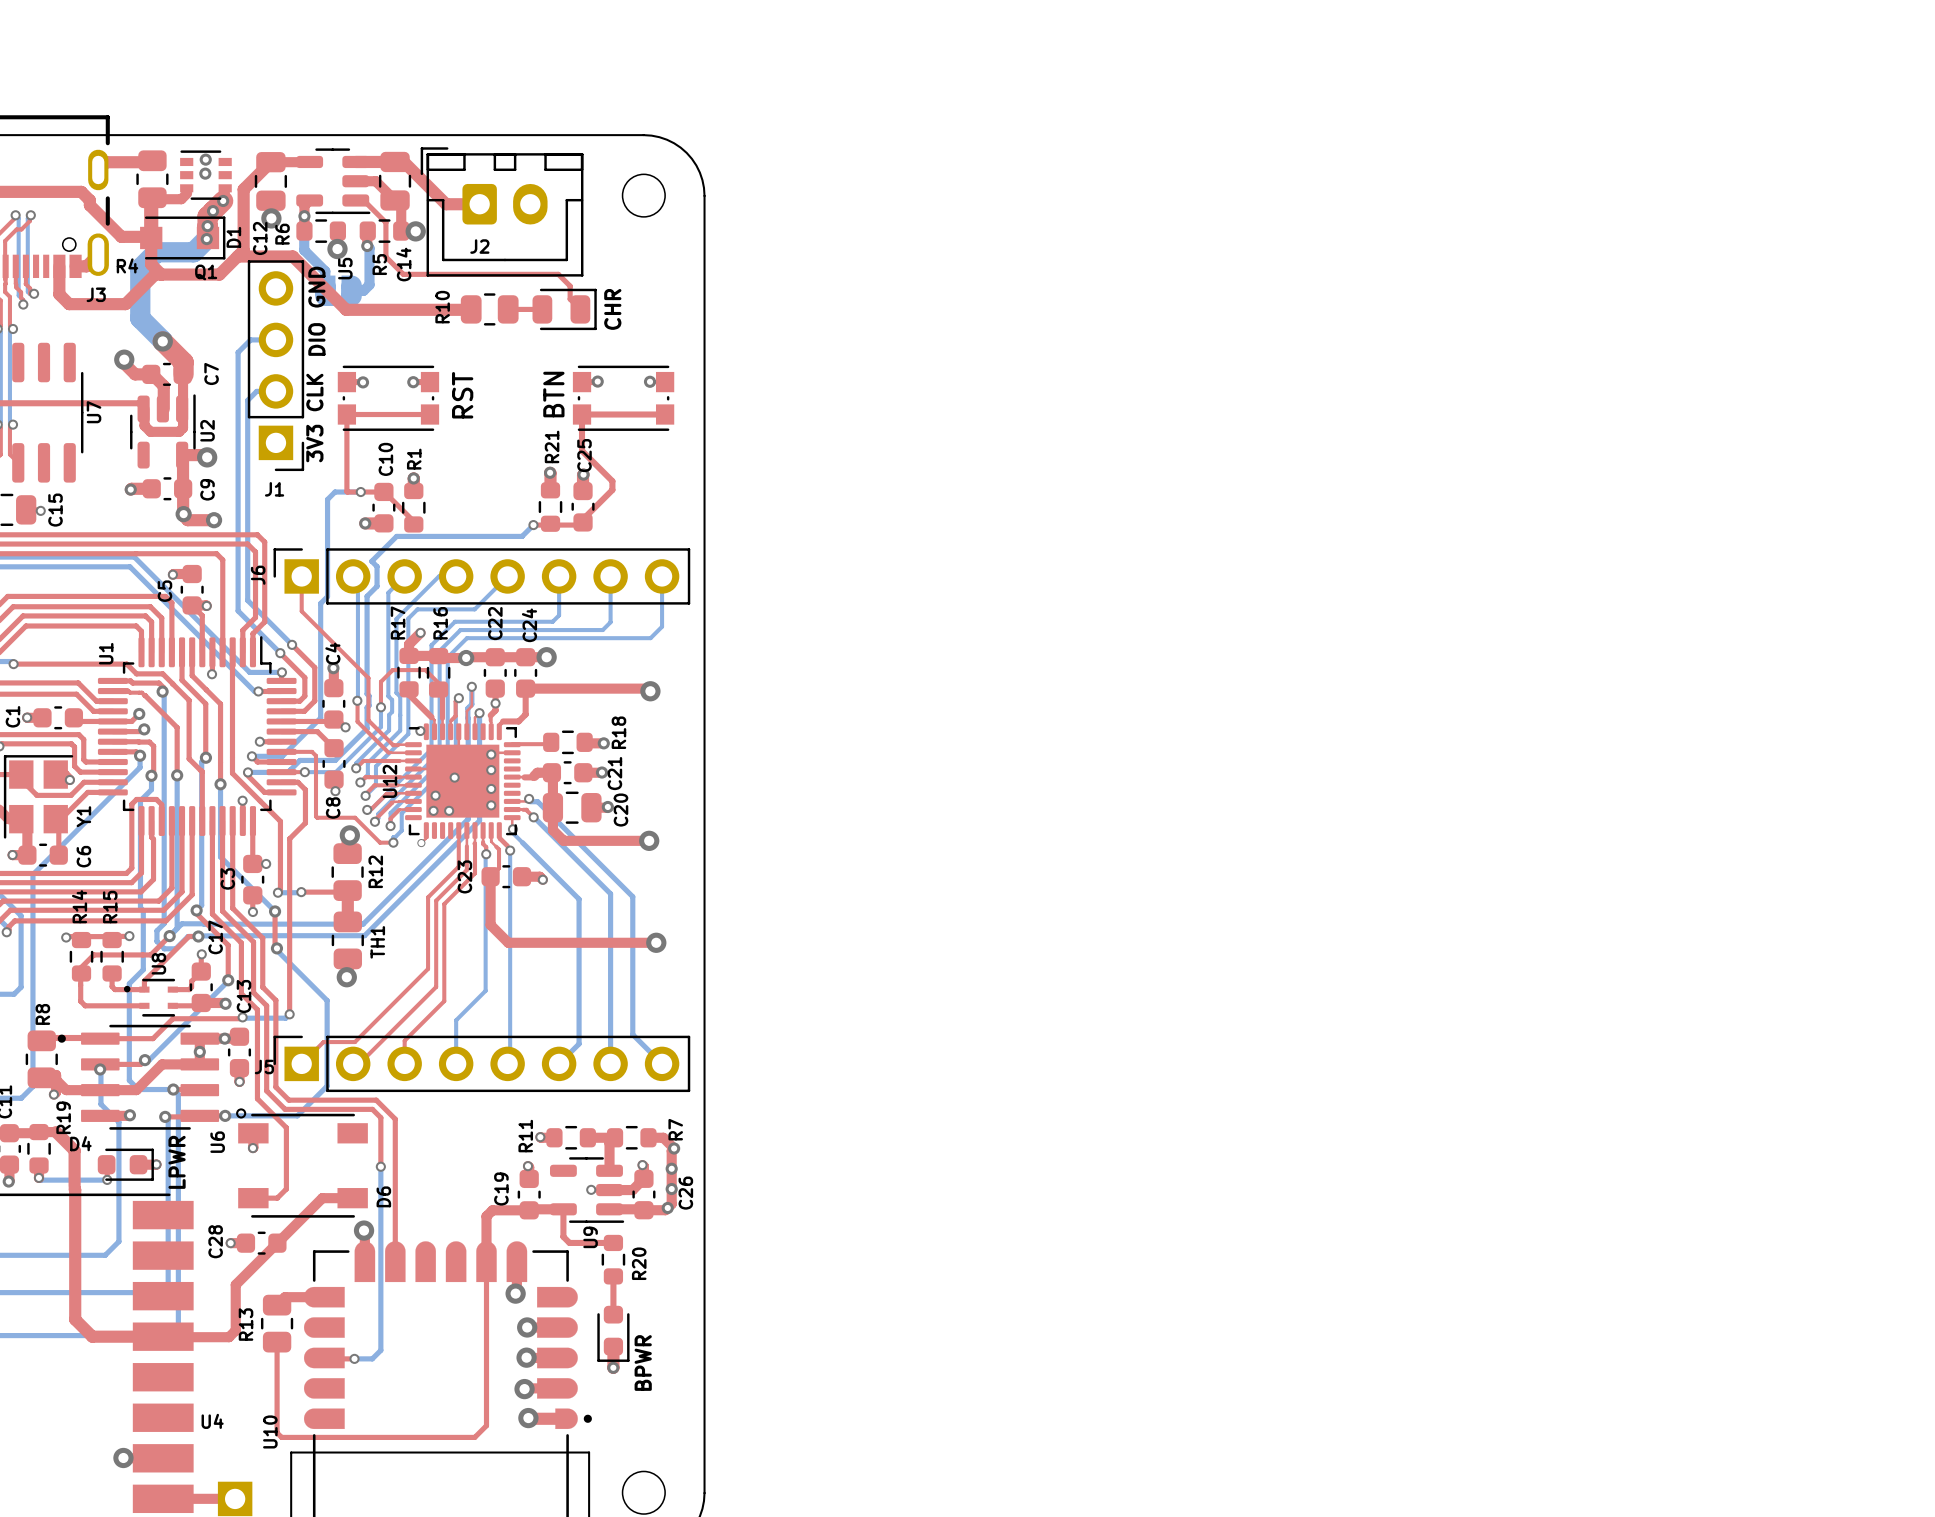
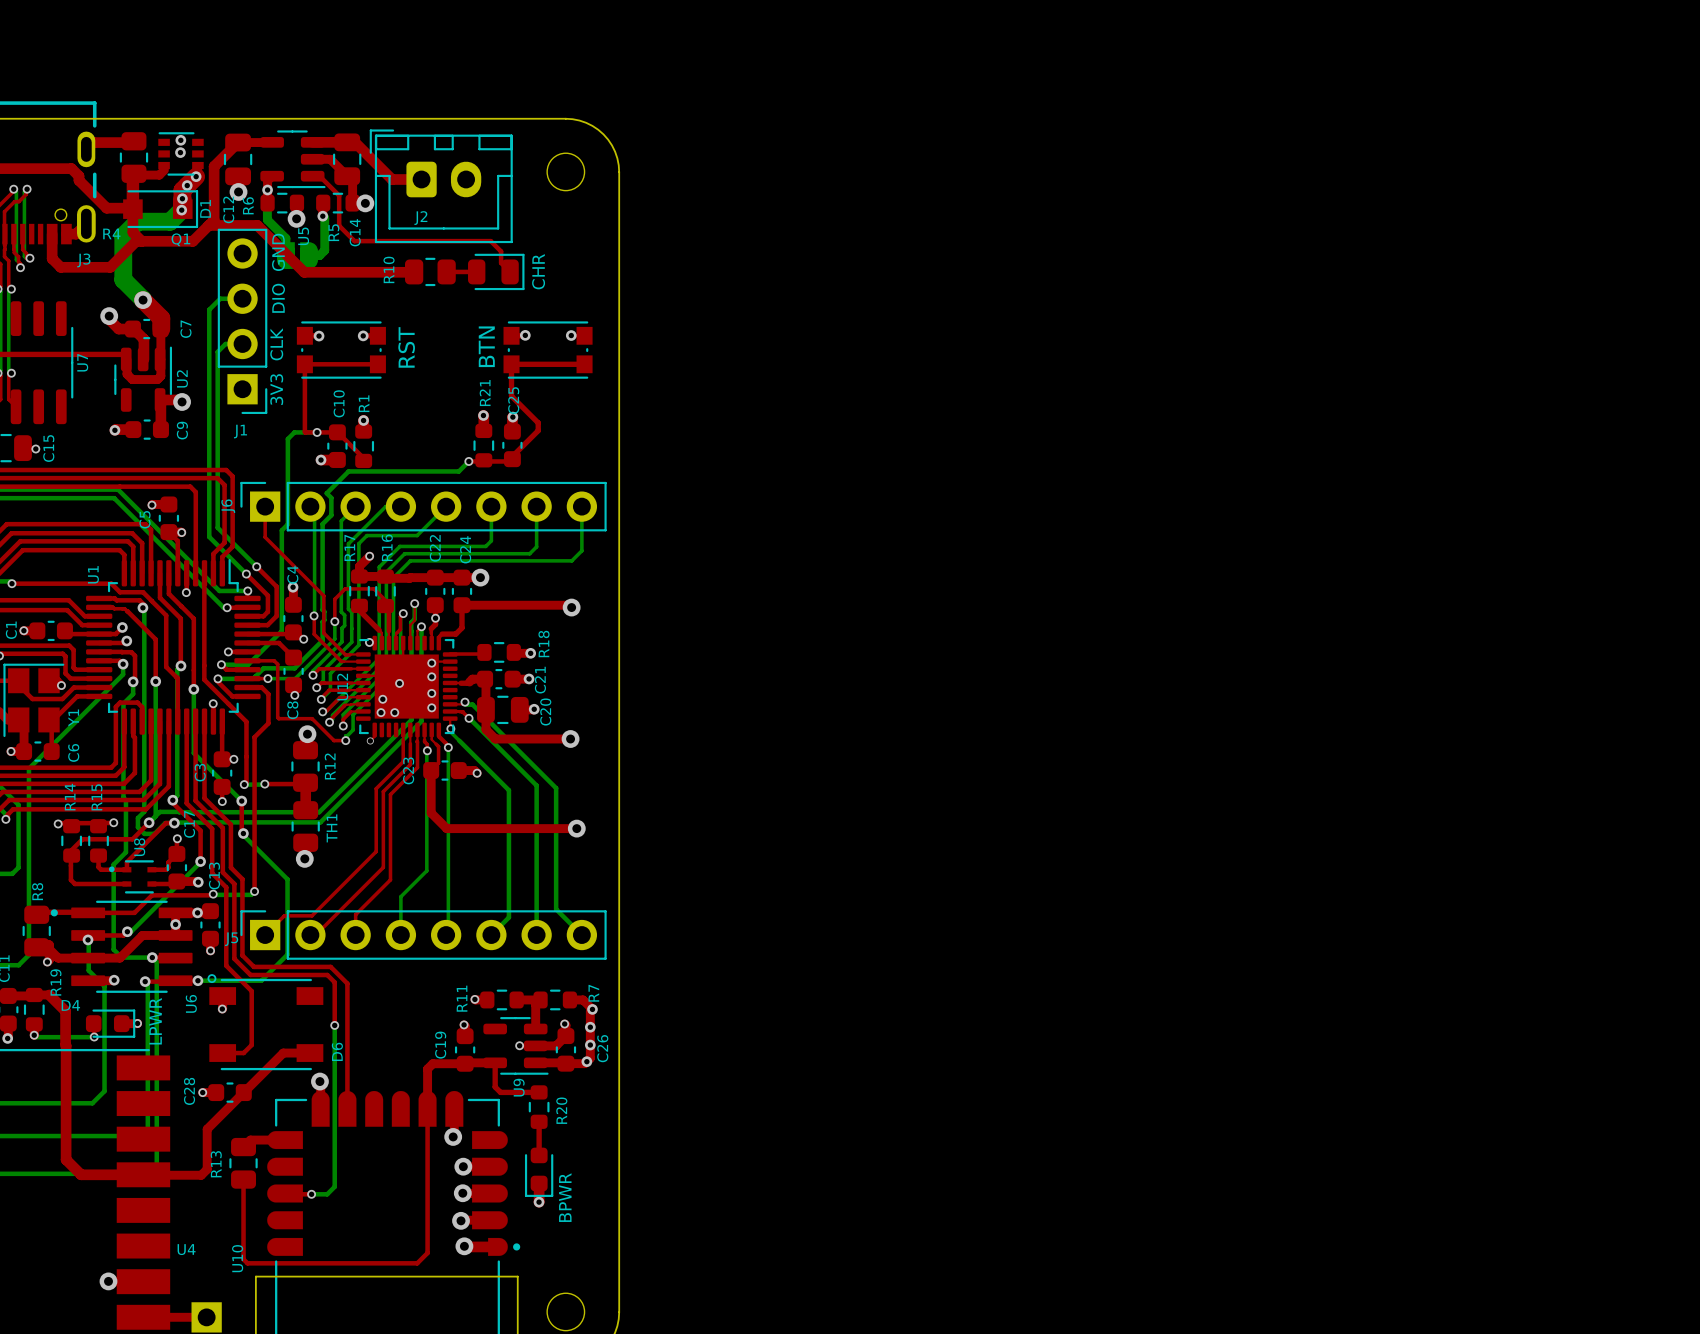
top track: (183, 488) (183, 516) (187, 520) (214, 520) -> none
via: (183, 514) -> none
via: (214, 520) -> none
via: (466, 658) -> none

